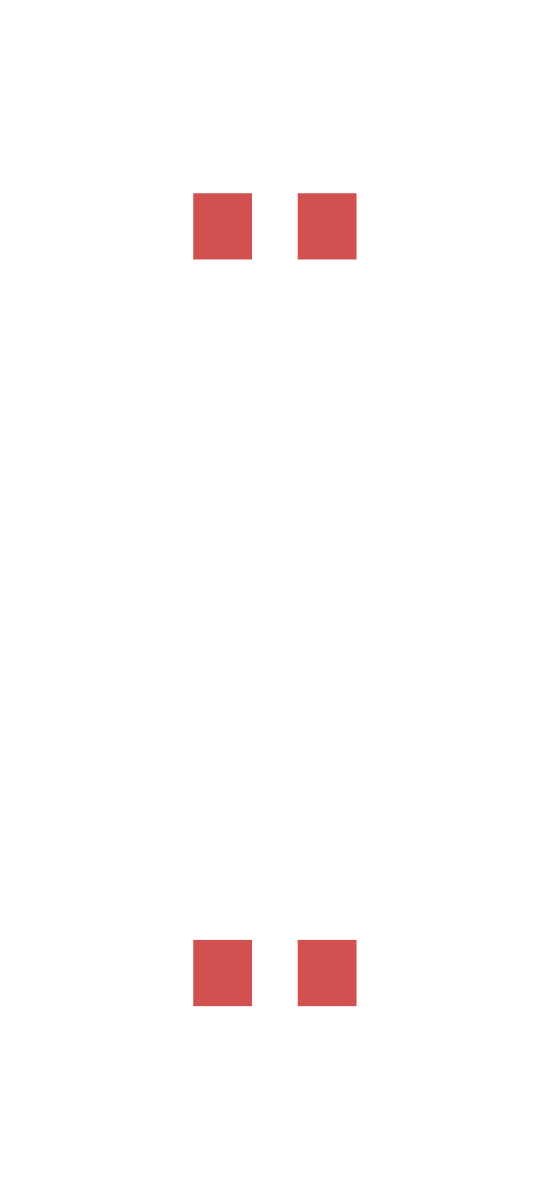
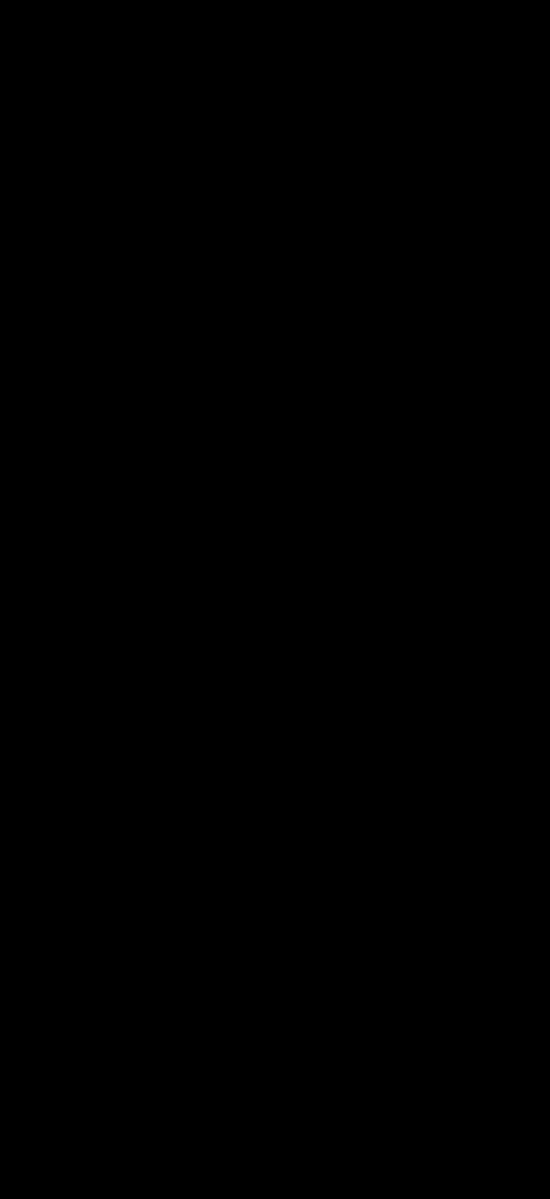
part: (274, 226) -> none
part: (274, 973) -> none

